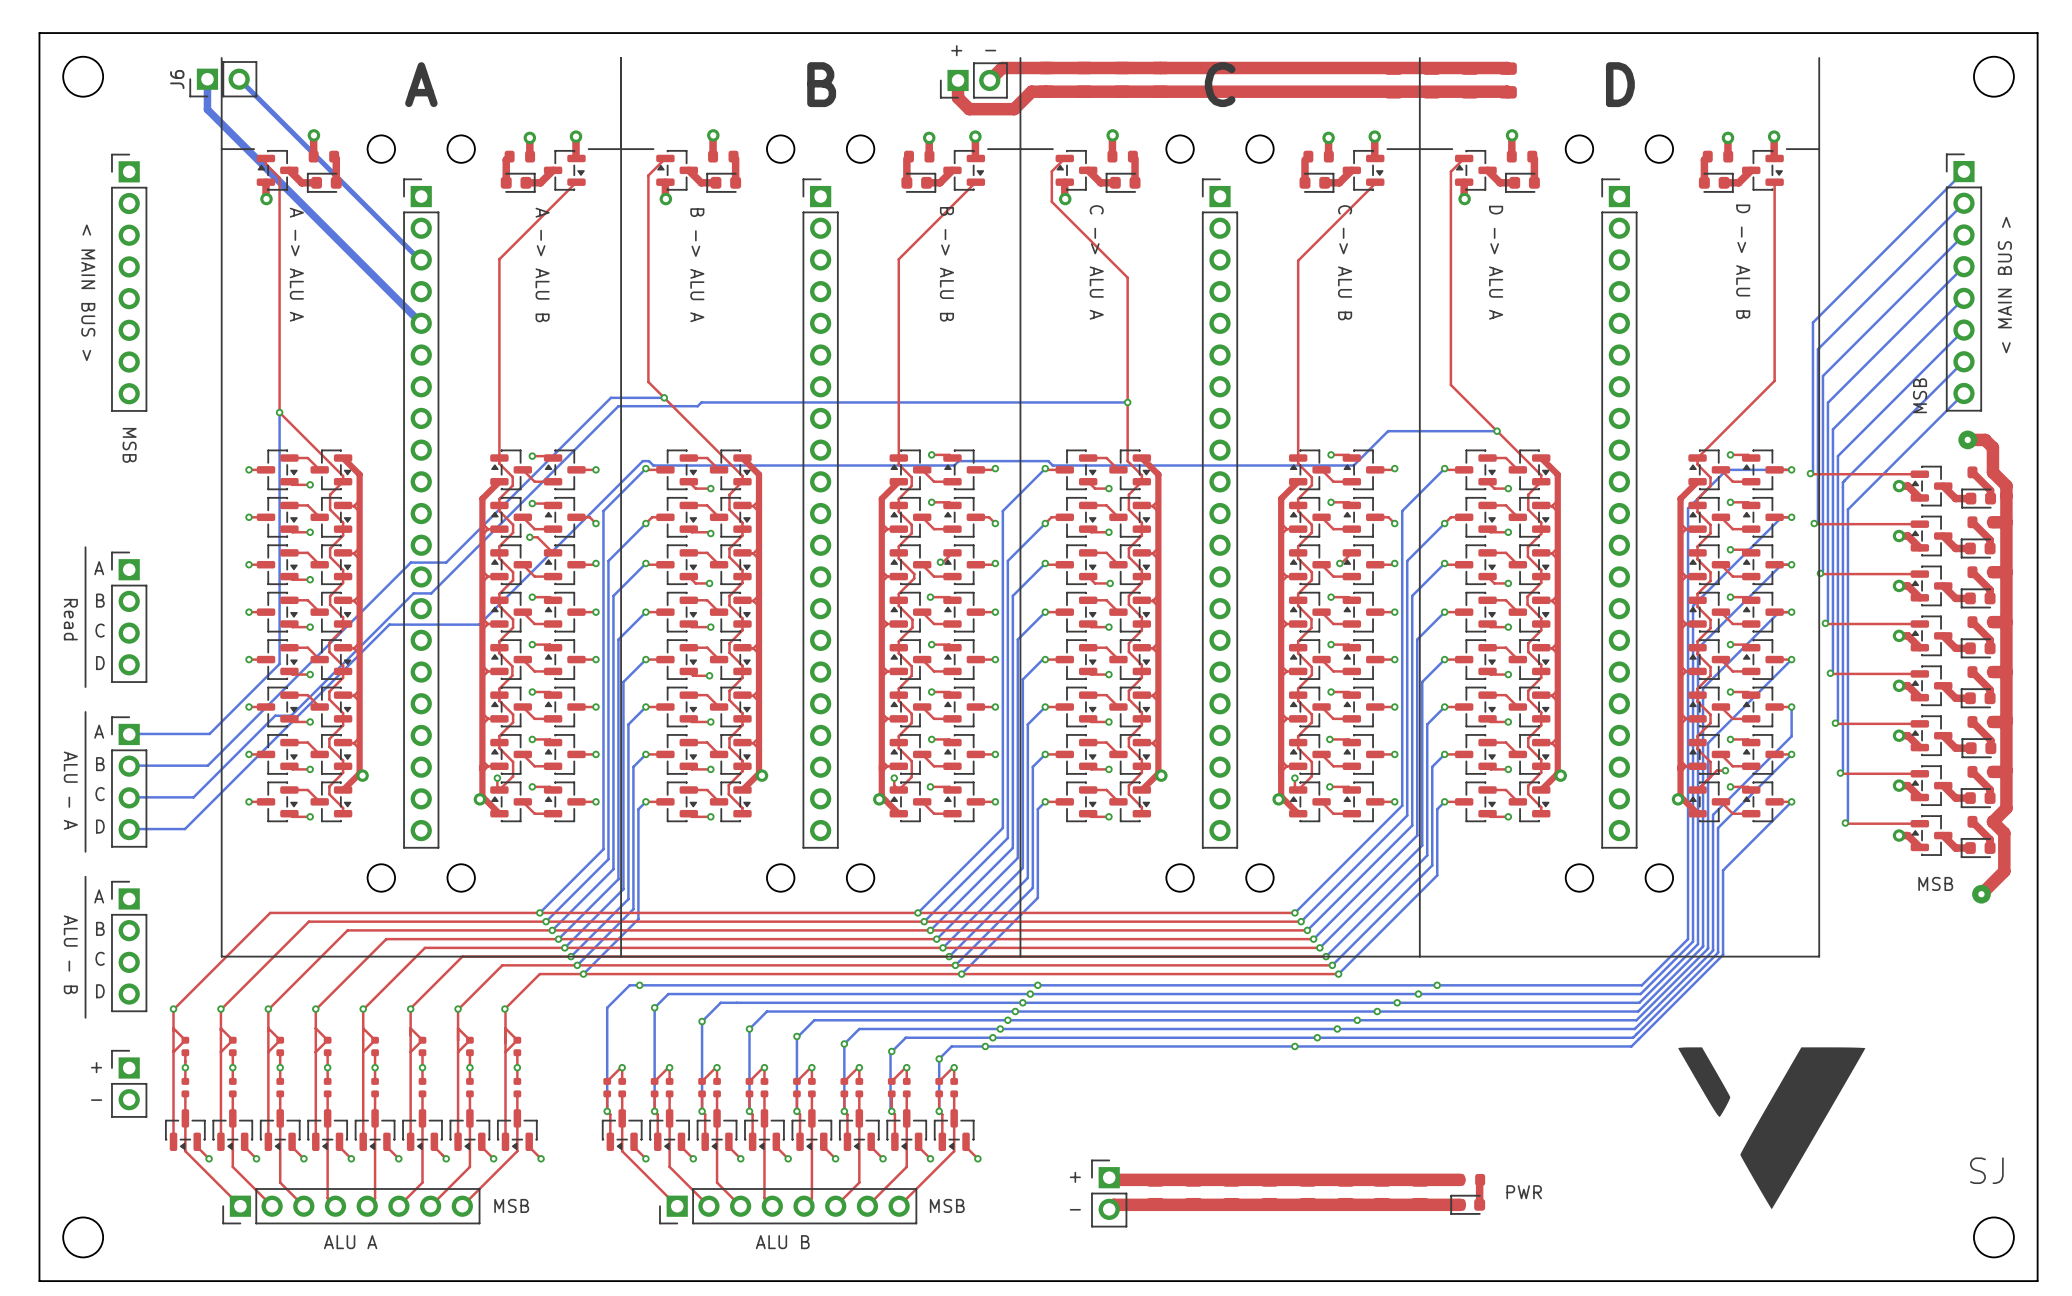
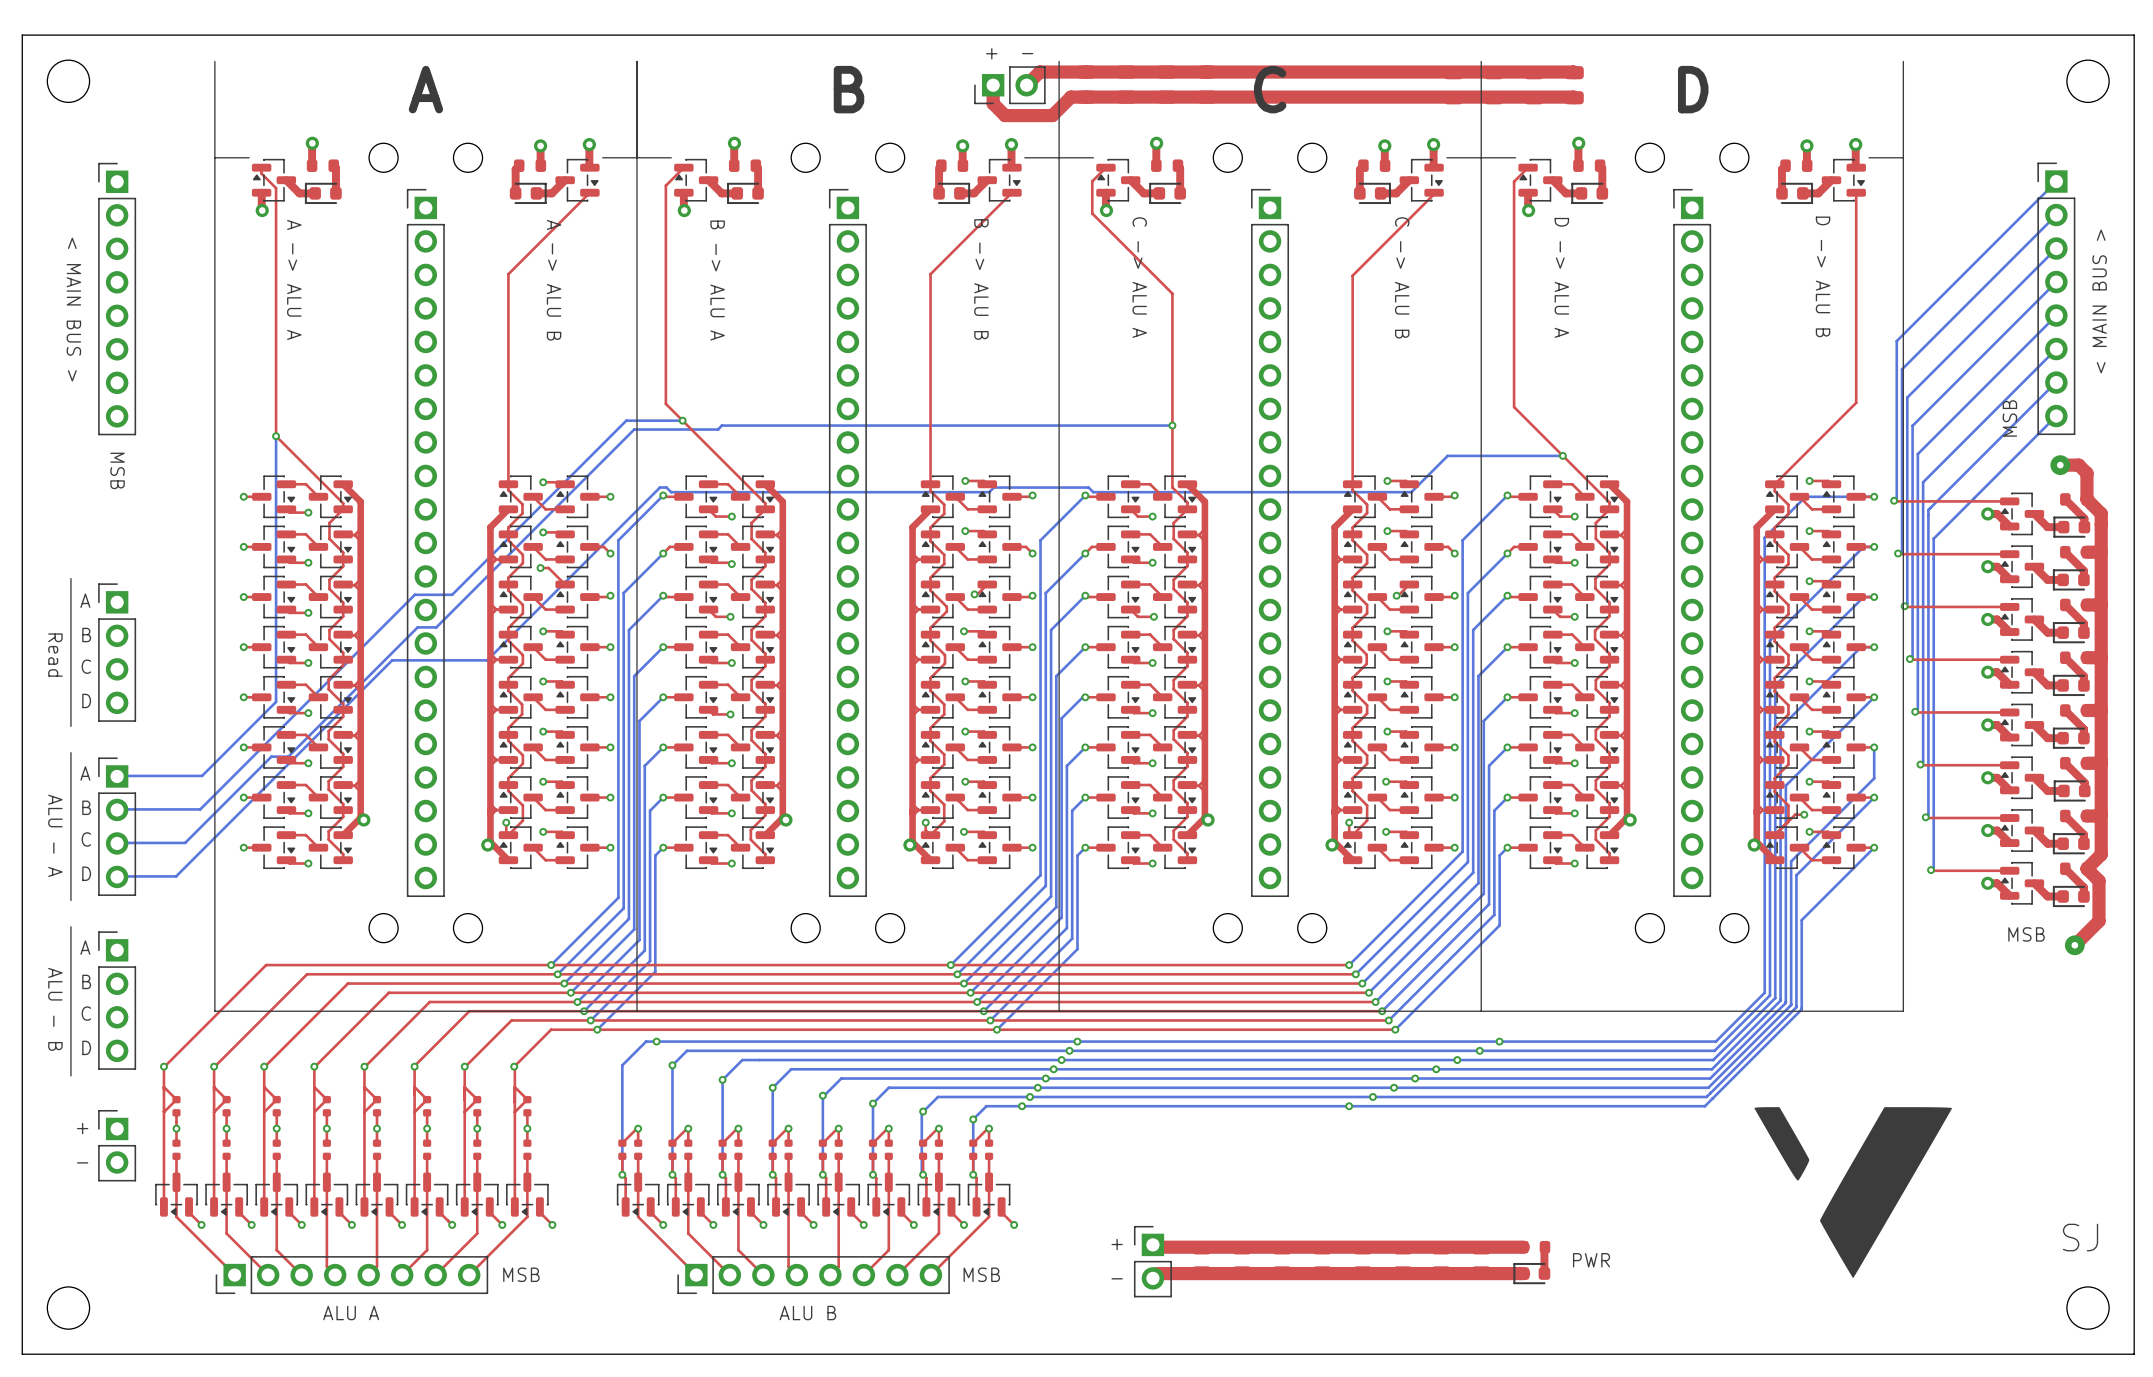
bottom track: (207, 79) (207, 109) (421, 323) -> none
J6: (223, 79) -> none
bottom track: (239, 79) (421, 259) -> none

